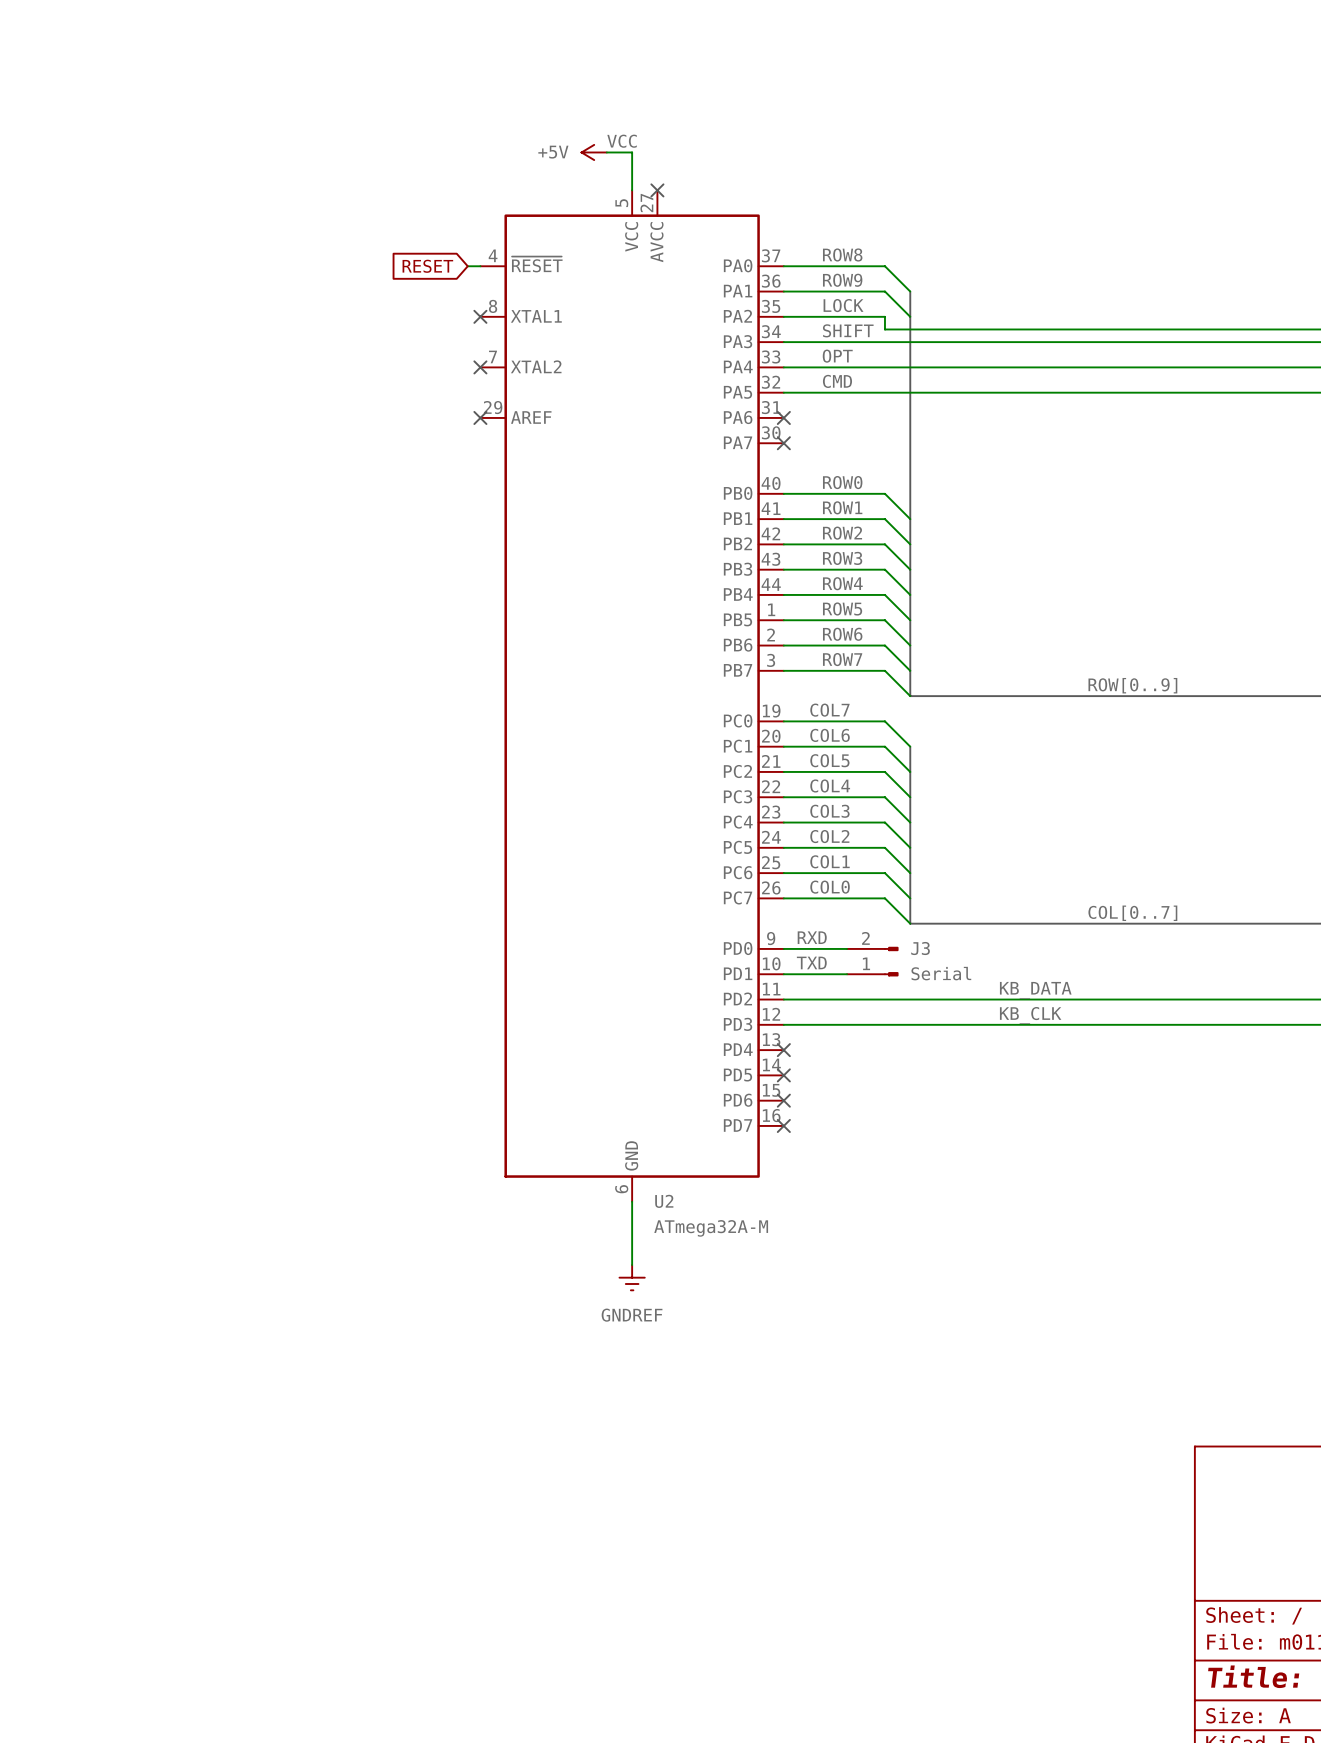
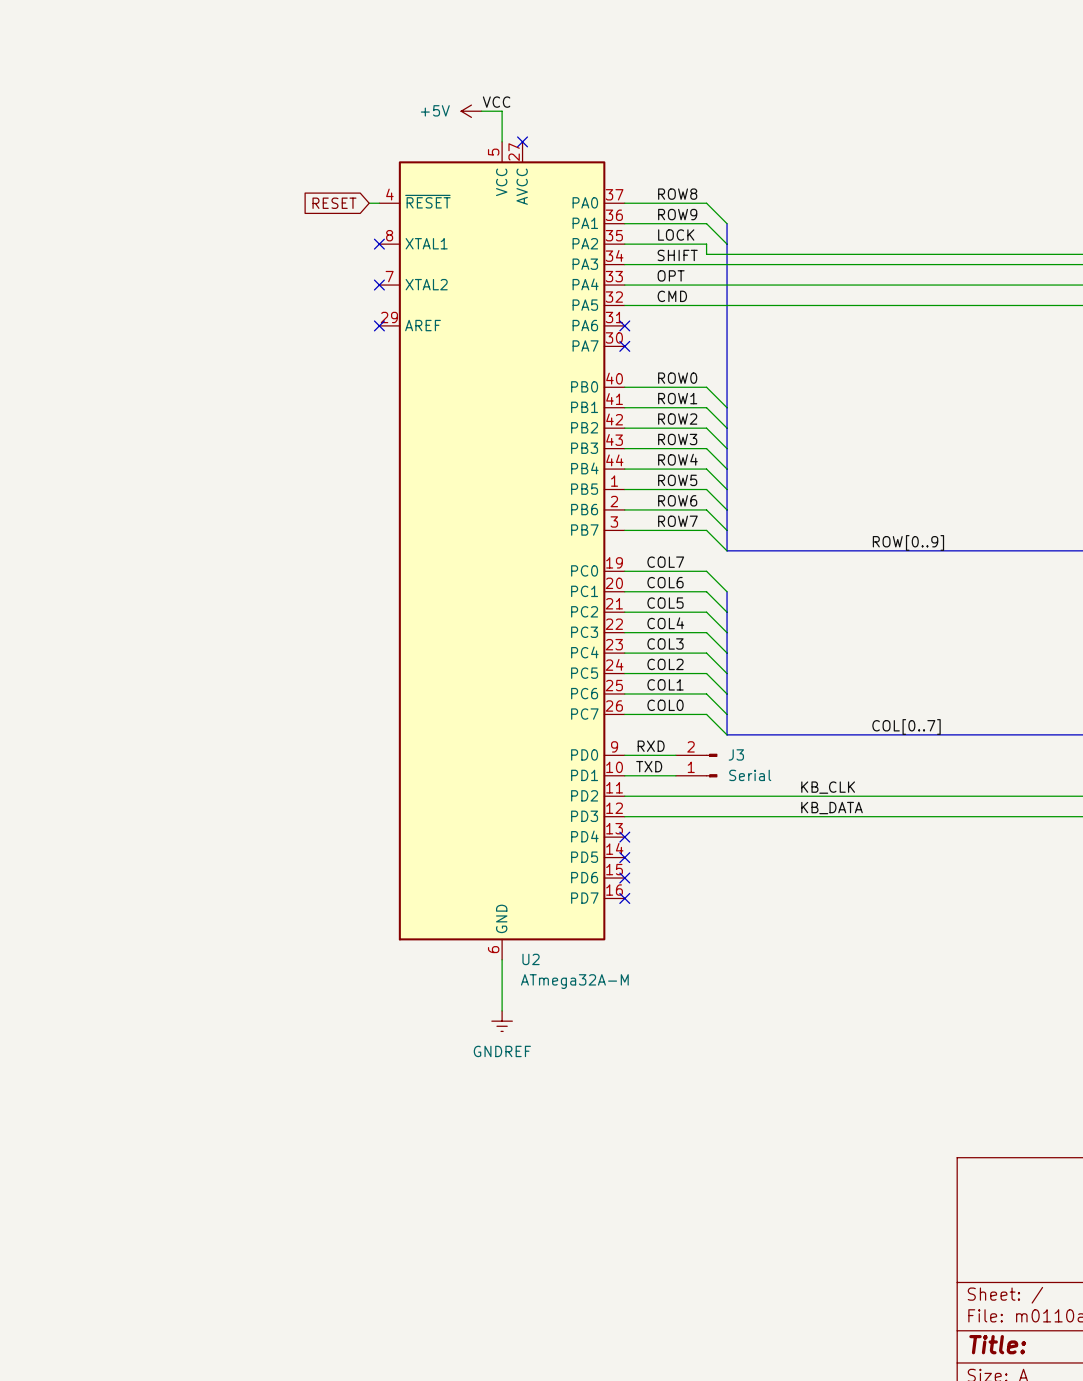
label: KB_DATA (1035, 990) -> KB_CLK (828, 787)
label: KB_CLK (1030, 1015) -> KB_DATA (832, 808)

